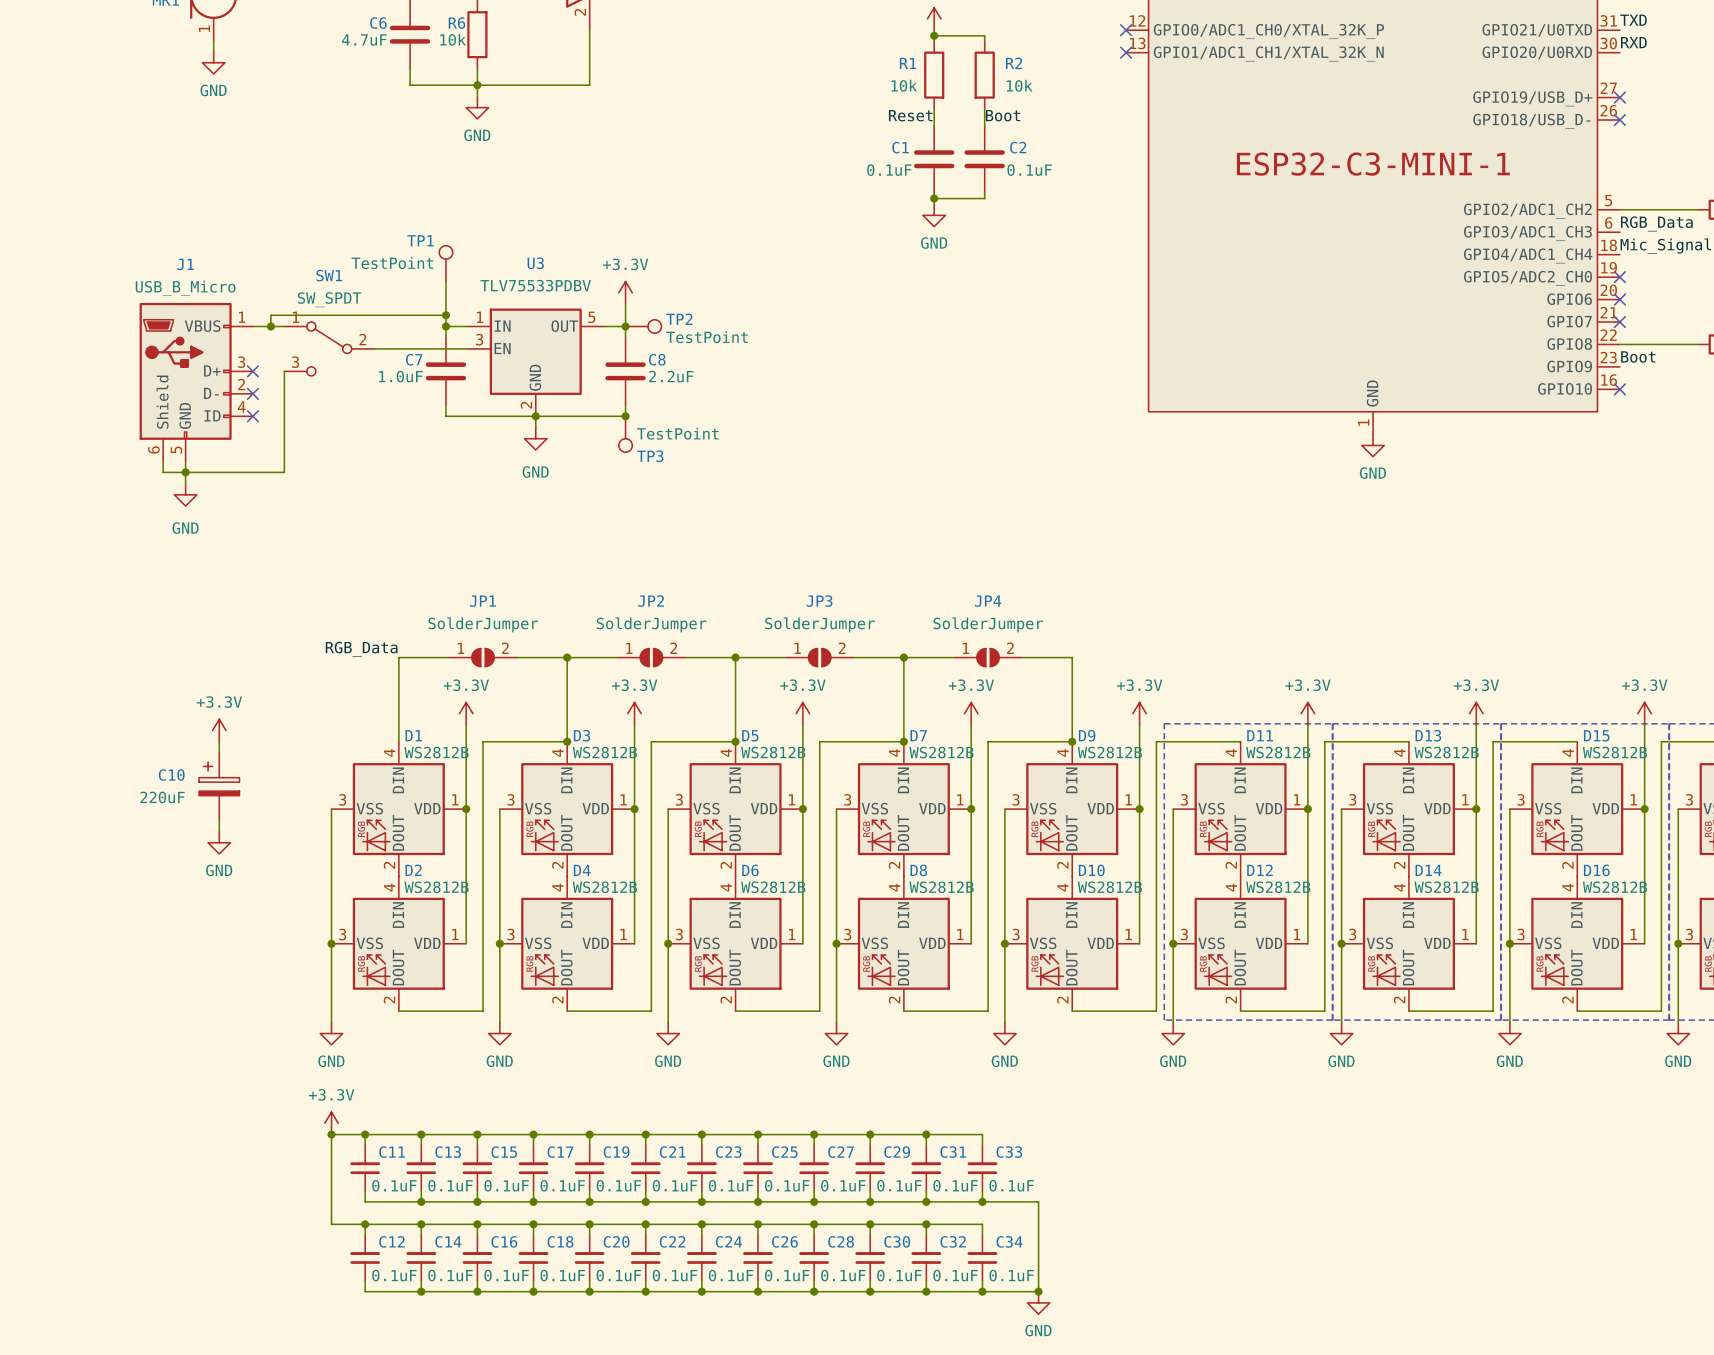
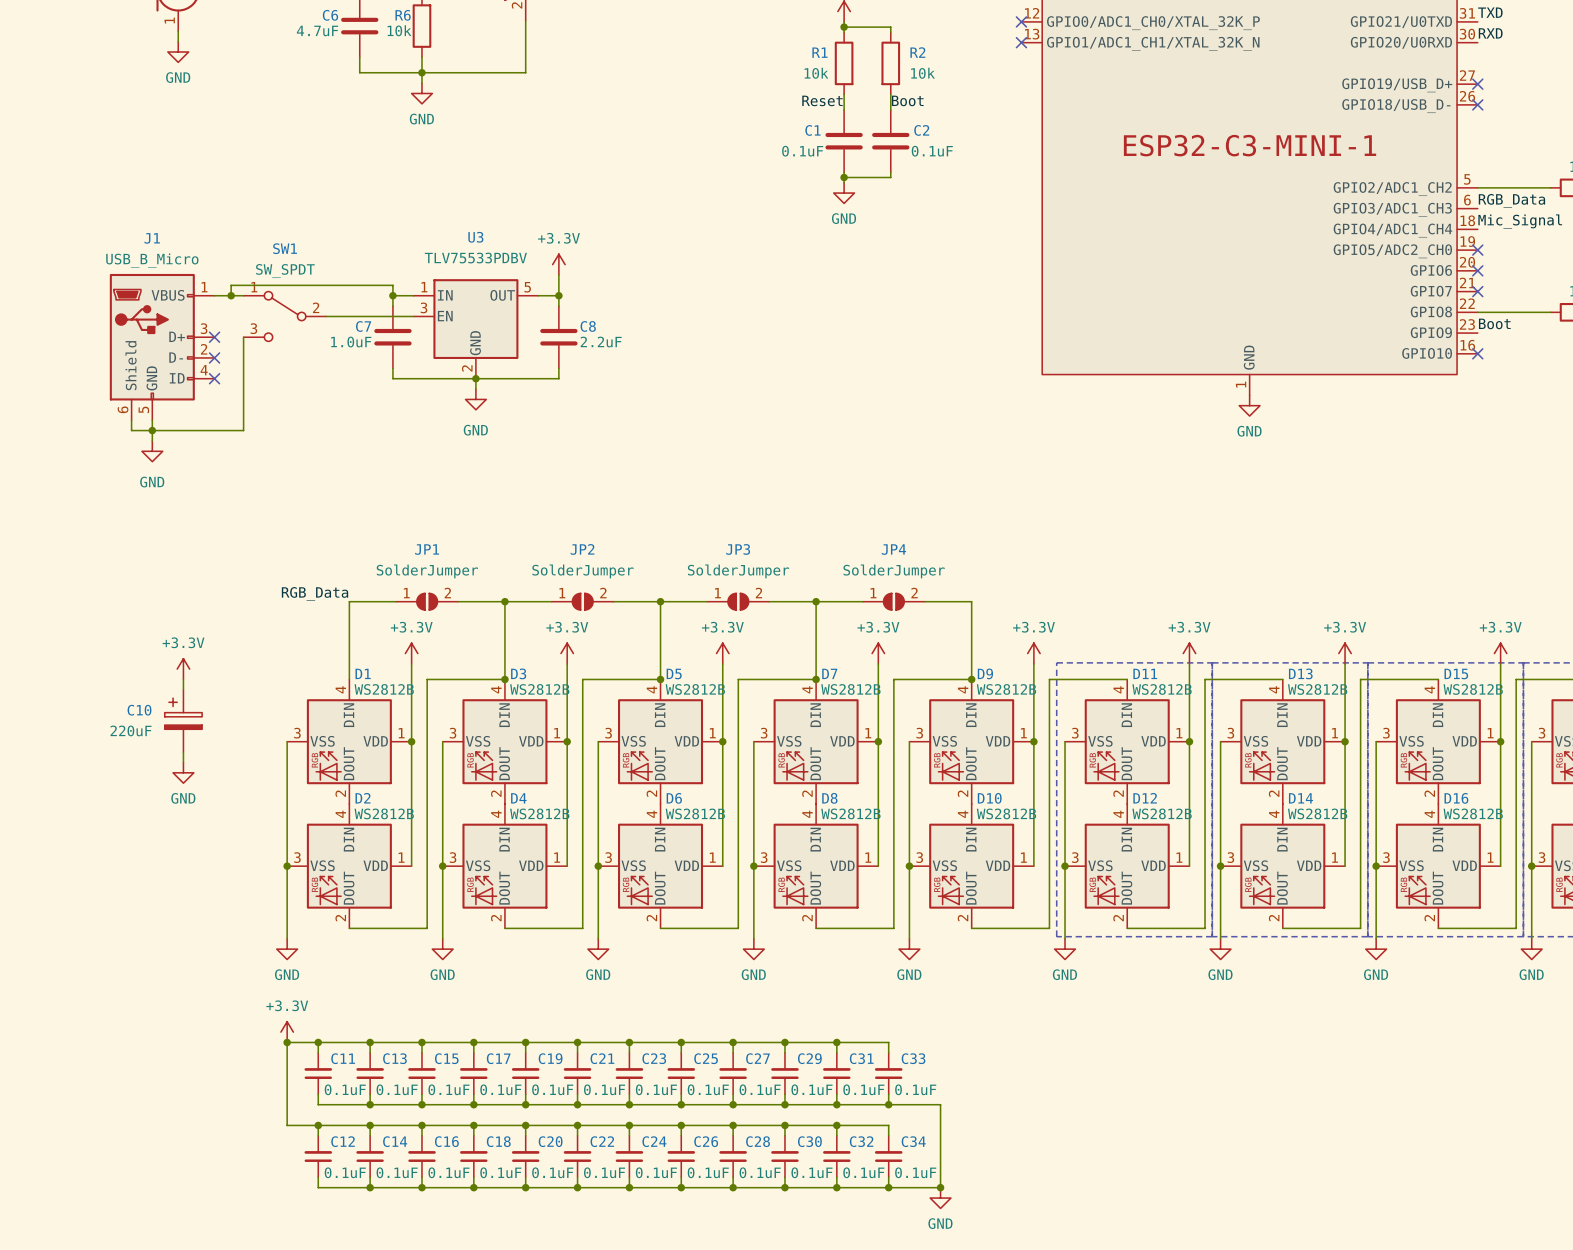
TP1: TestPoint (445, 263) -> none
wire: (445, 281) (445, 315) -> none
junction: (445, 315) -> none
TP2: TestPoint (643, 326) -> none
junction: (625, 416) -> none
TP3: TestPoint (625, 434) -> none

